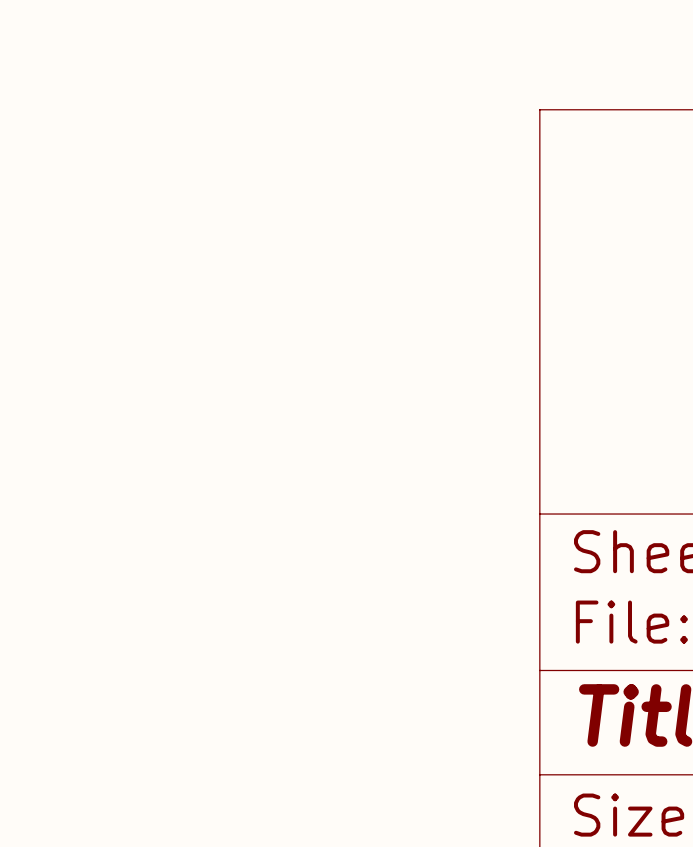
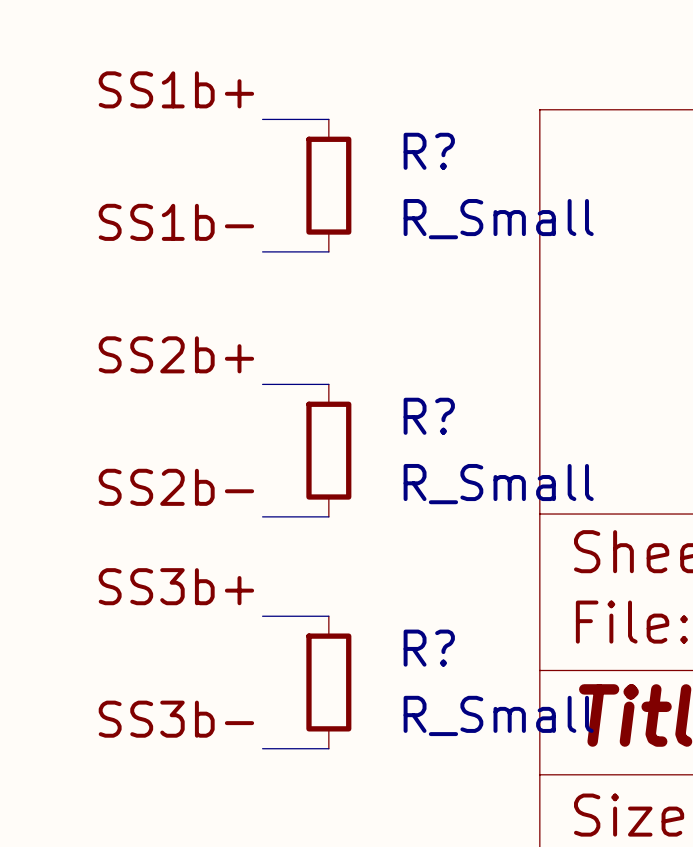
label: none -> SS1b+ (176, 89)
wire: none -> (262, 119) (328, 119)
R?: none -> R_Small (328, 185)
label: none -> SS1b- (176, 222)
wire: none -> (262, 251) (328, 251)
label: none -> SS2b+ (176, 354)
wire: none -> (262, 384) (328, 384)
R?: none -> R_Small (328, 450)
label: none -> SS2b- (176, 487)
wire: none -> (262, 516) (328, 516)
label: none -> SS3b+ (176, 586)
wire: none -> (262, 616) (328, 616)
R?: none -> R_Small (328, 682)
label: none -> SS3b- (176, 719)
wire: none -> (262, 748) (328, 748)

